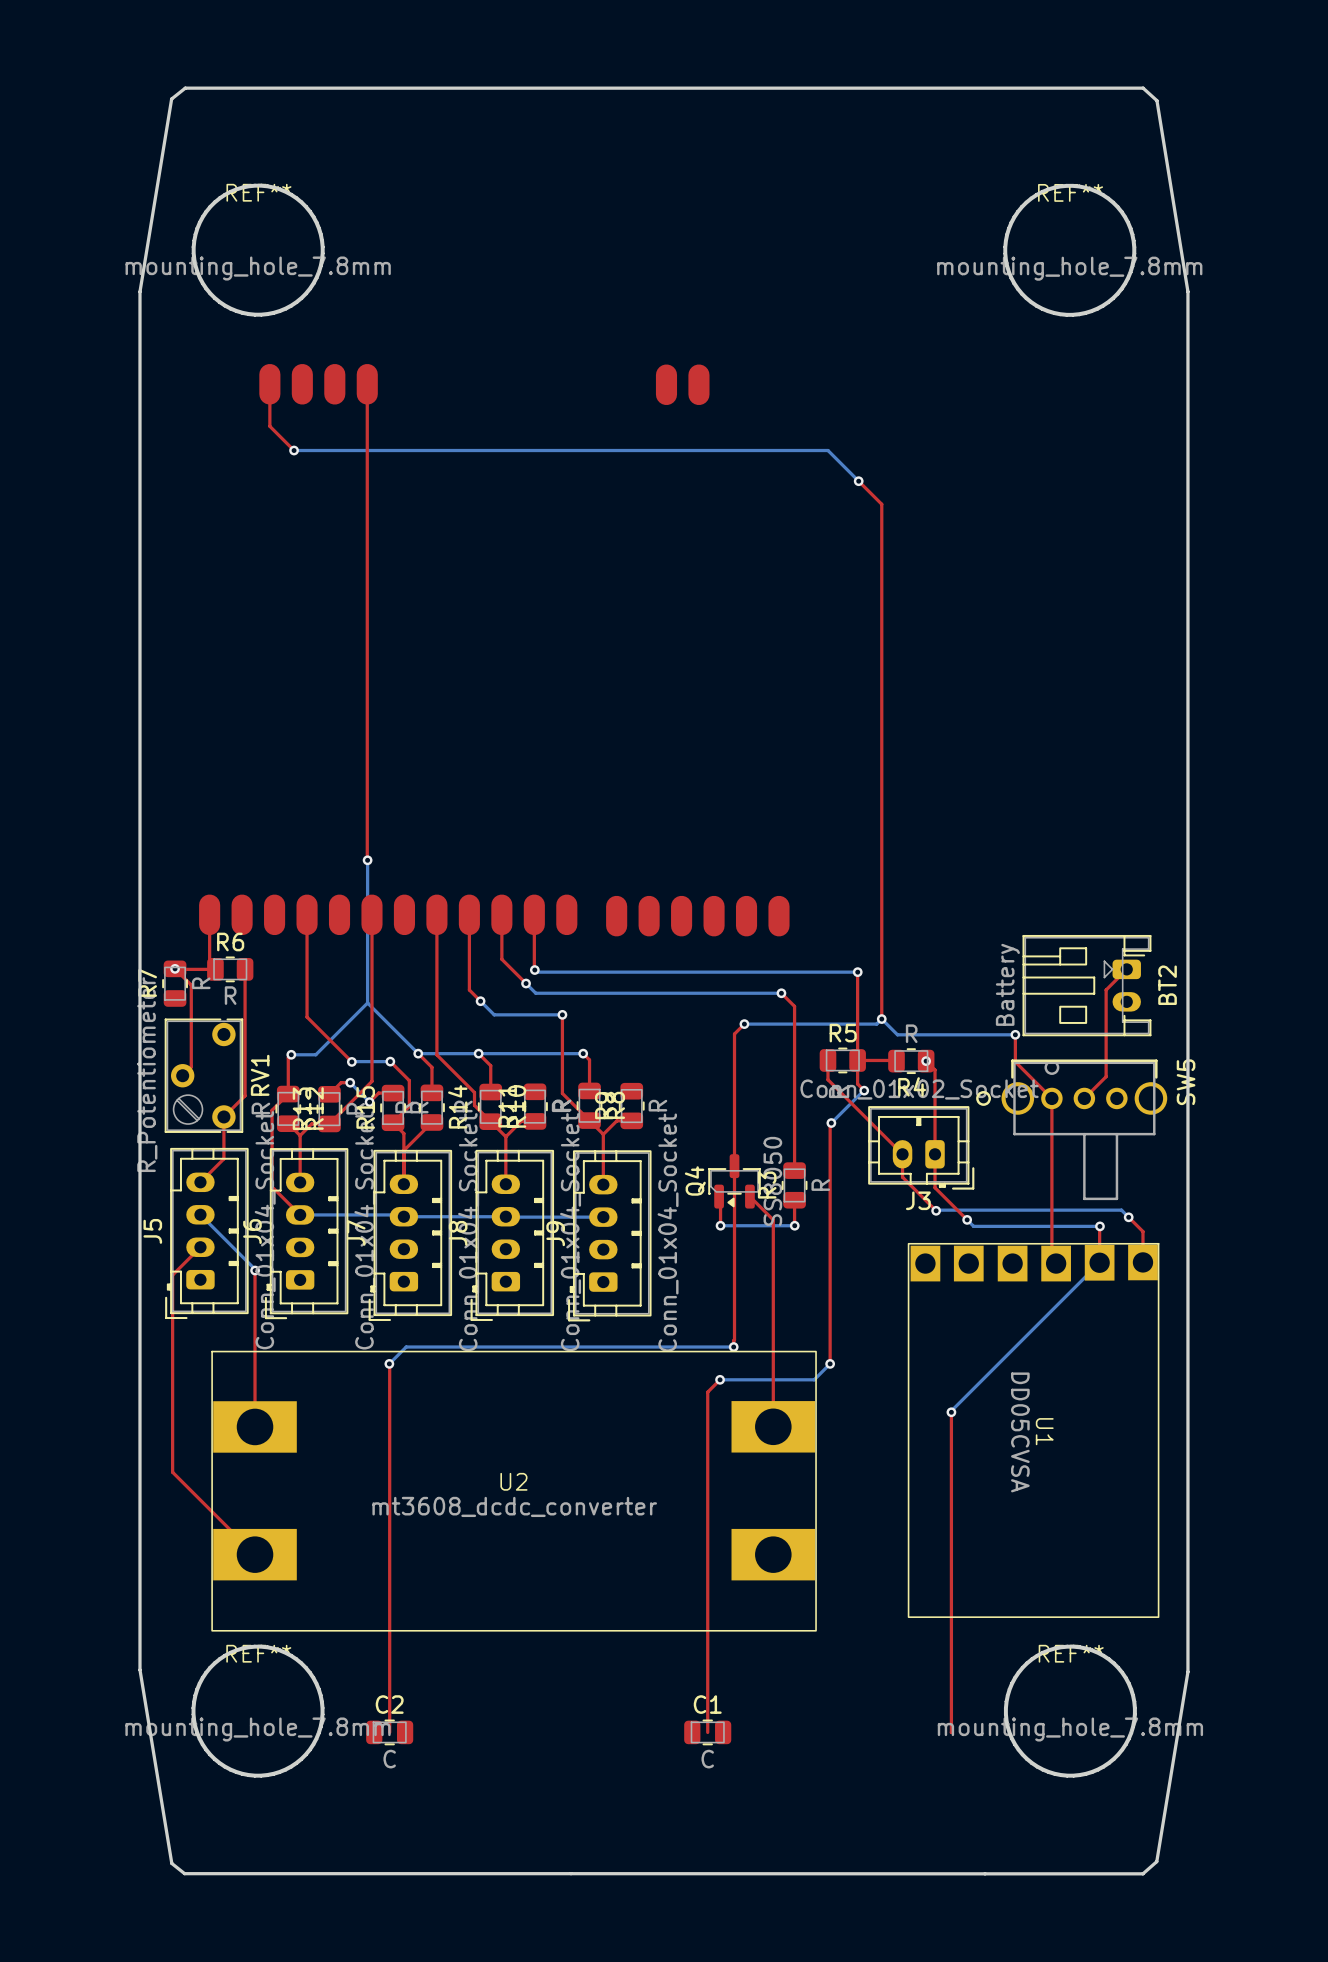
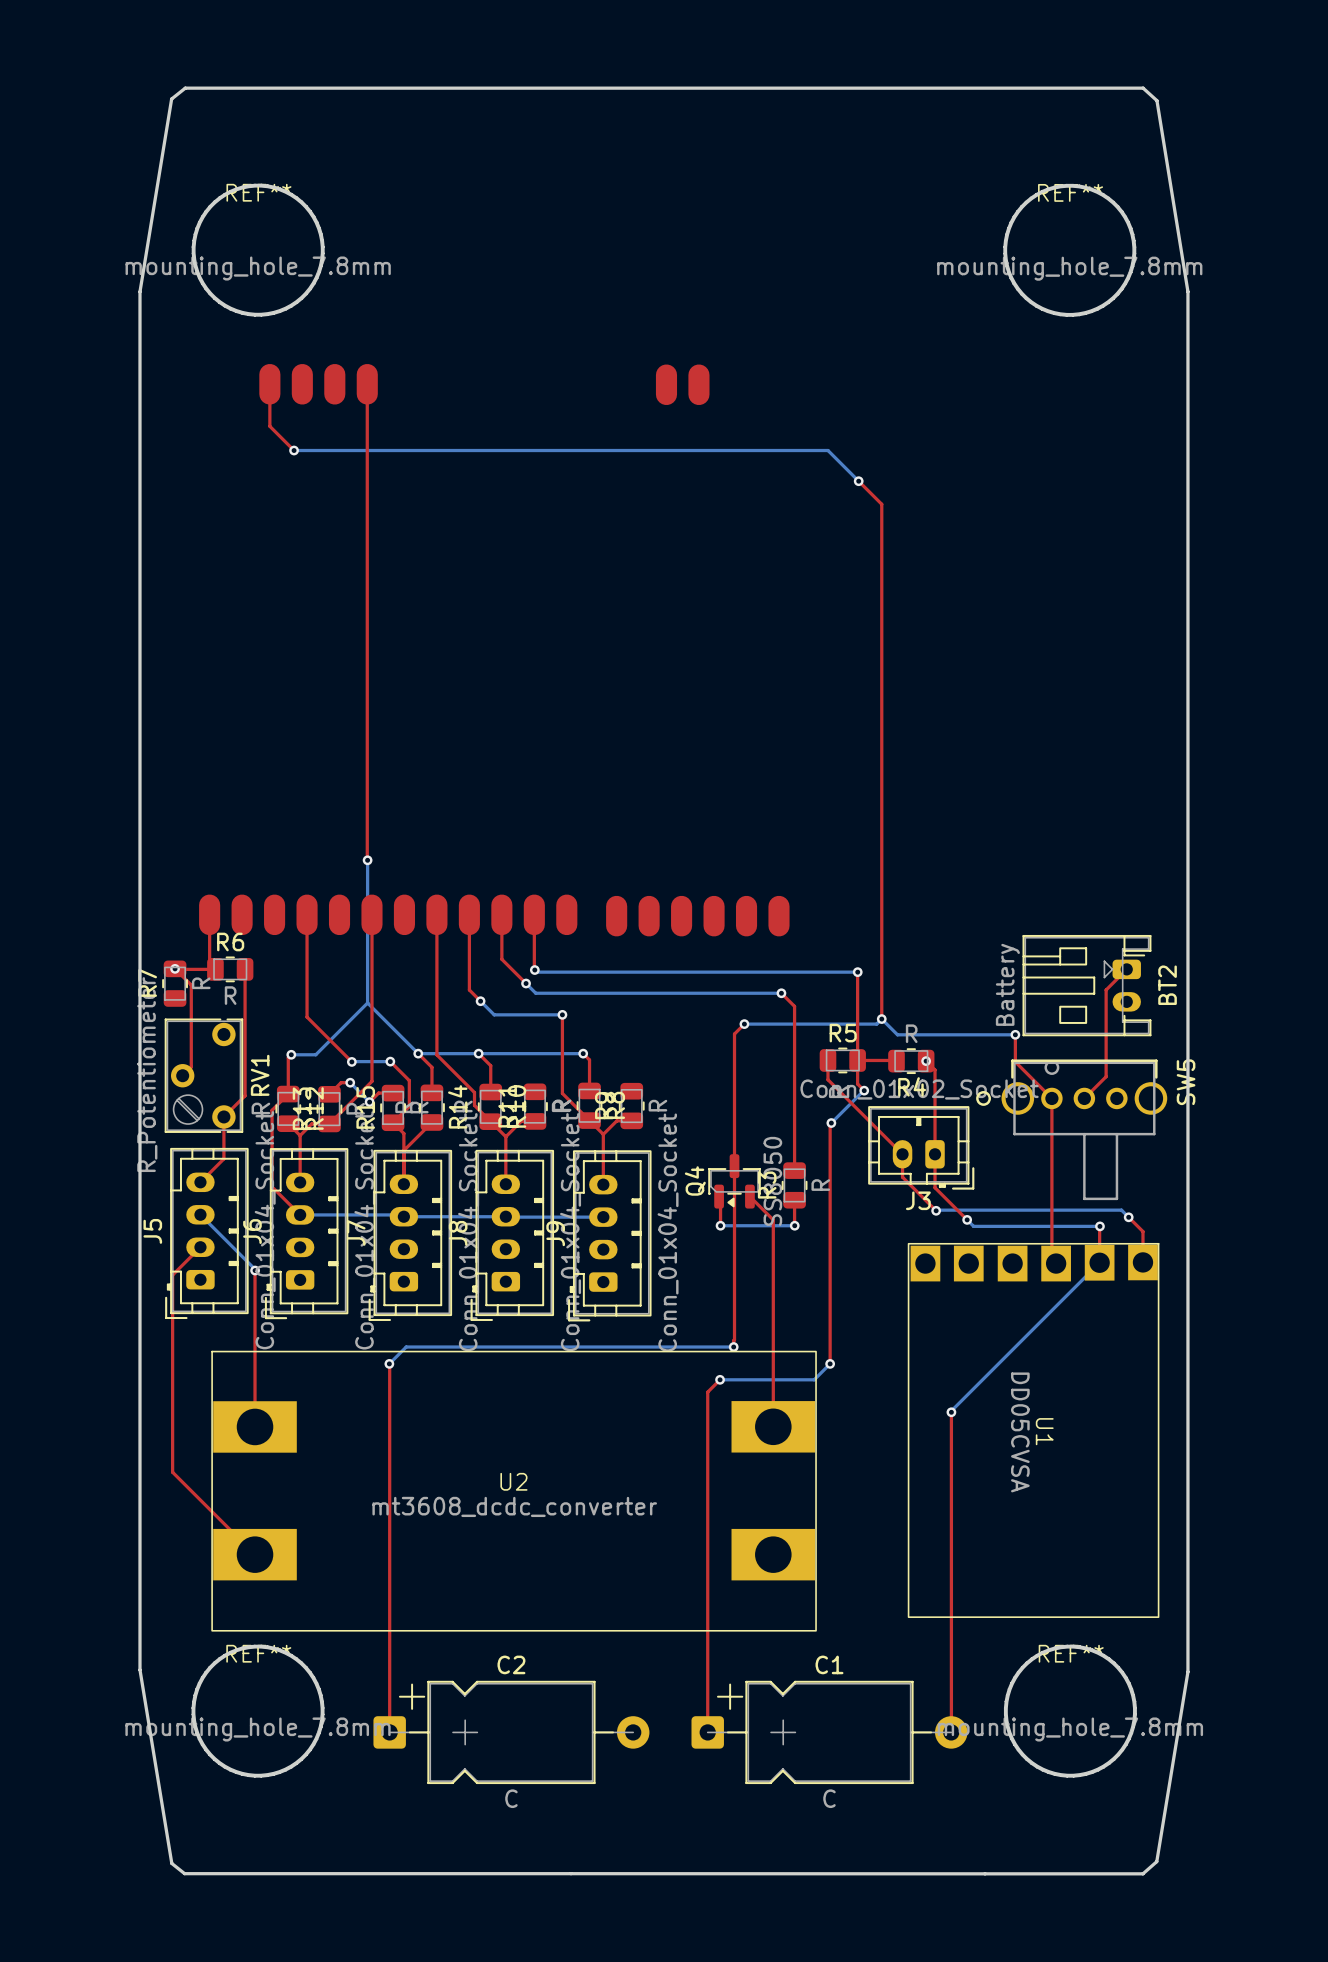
C2 name position: C2 (389, 1704) -> C2 (511, 1664)
C1 name position: C1 (707, 1704) -> C1 (829, 1664)
C2 footprint: [366, 1719, 414, 1746] -> [373, 1680, 650, 1785]
C1 footprint: [684, 1719, 732, 1746] -> [691, 1680, 968, 1785]
C2 value position: C (389, 1759) -> C (511, 1798)
C1 value position: C (707, 1759) -> C (829, 1798)

